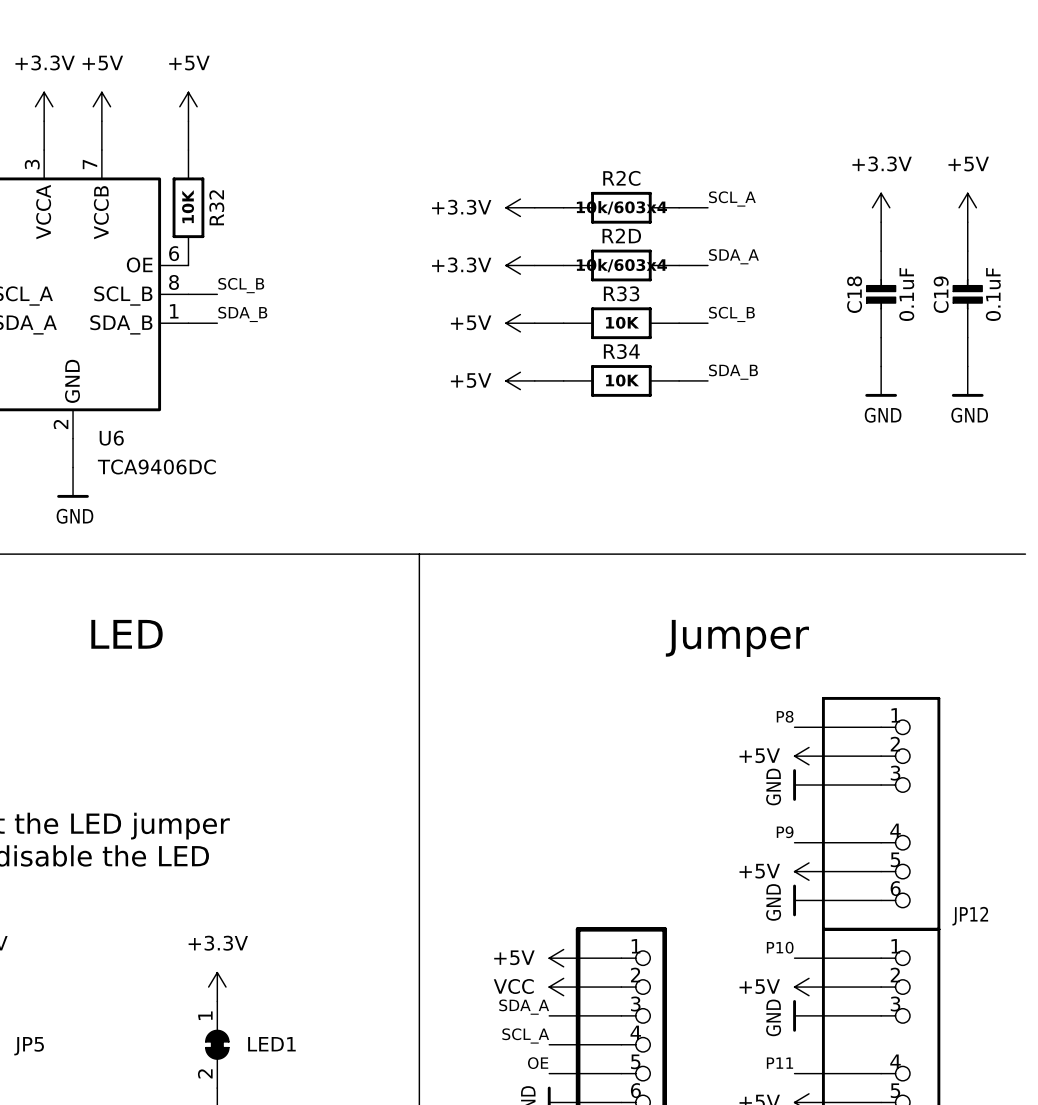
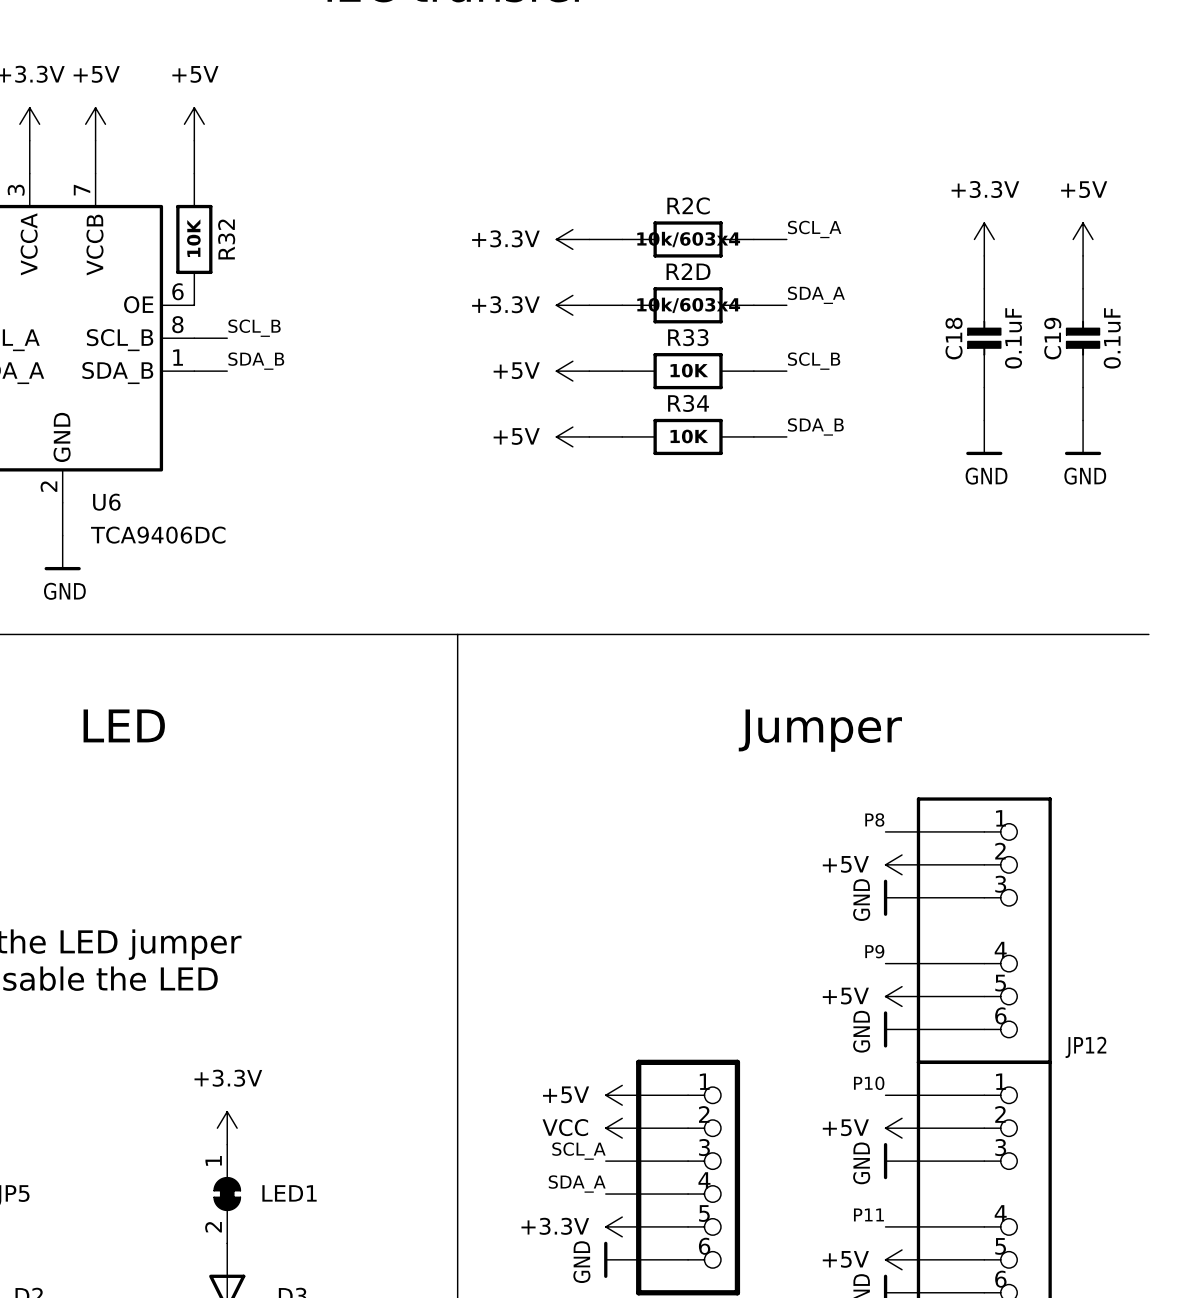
label: SDA_A (524, 1007) -> SCL_A (578, 1151)
label: SCL_A (525, 1035) -> SDA_A (577, 1184)
label: OE (538, 1063) -> none
power symbol: none -> +3.3V (622, 1226)

